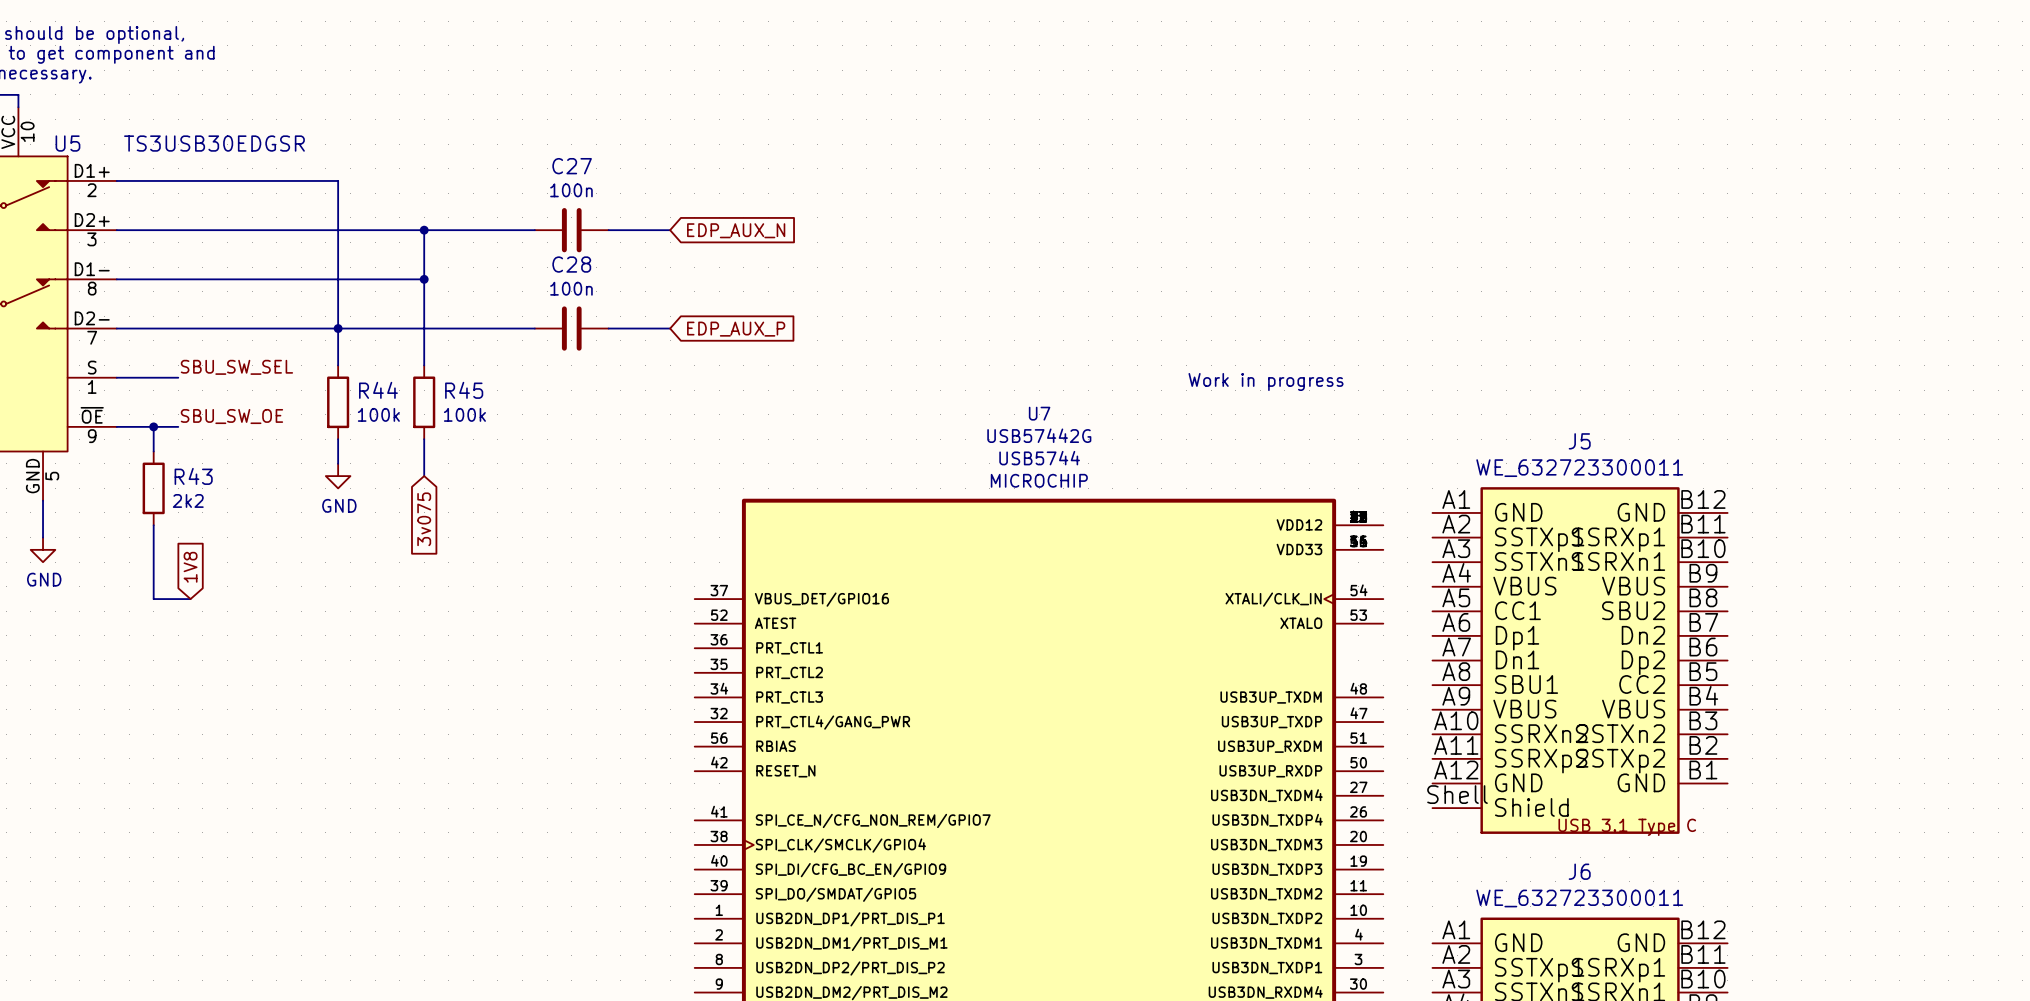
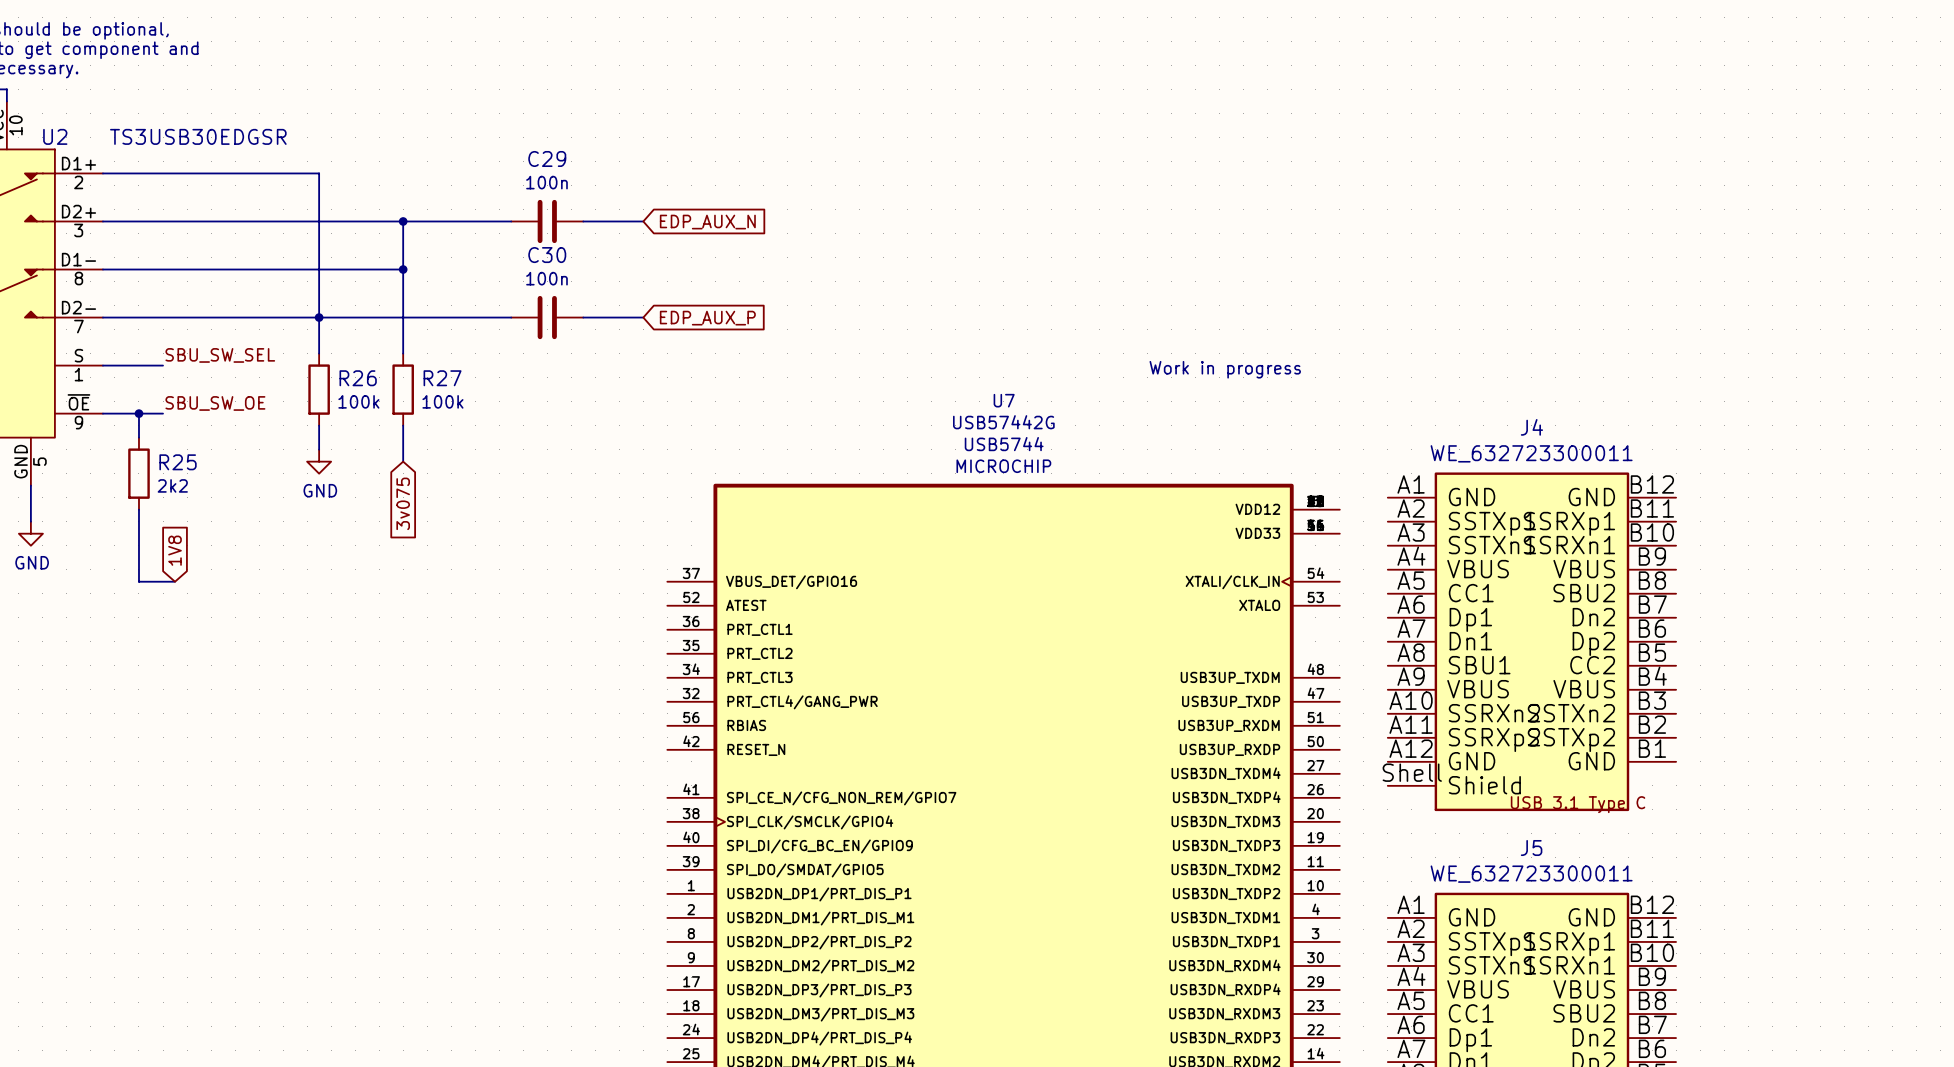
U5 name: U5 (67, 143) -> U2 (55, 136)
C27 name: C27 (572, 166) -> C29 (547, 158)
C28 name: C28 (571, 264) -> C30 (547, 255)
R44 name: R44 (378, 390) -> R26 (358, 378)
R45 name: R45 (464, 390) -> R27 (442, 378)
J5 name: J5 (1579, 441) -> J4 (1531, 427)
R43 name: R43 (193, 476) -> R25 (178, 462)
J6 name: J6 (1579, 871) -> J5 (1531, 848)

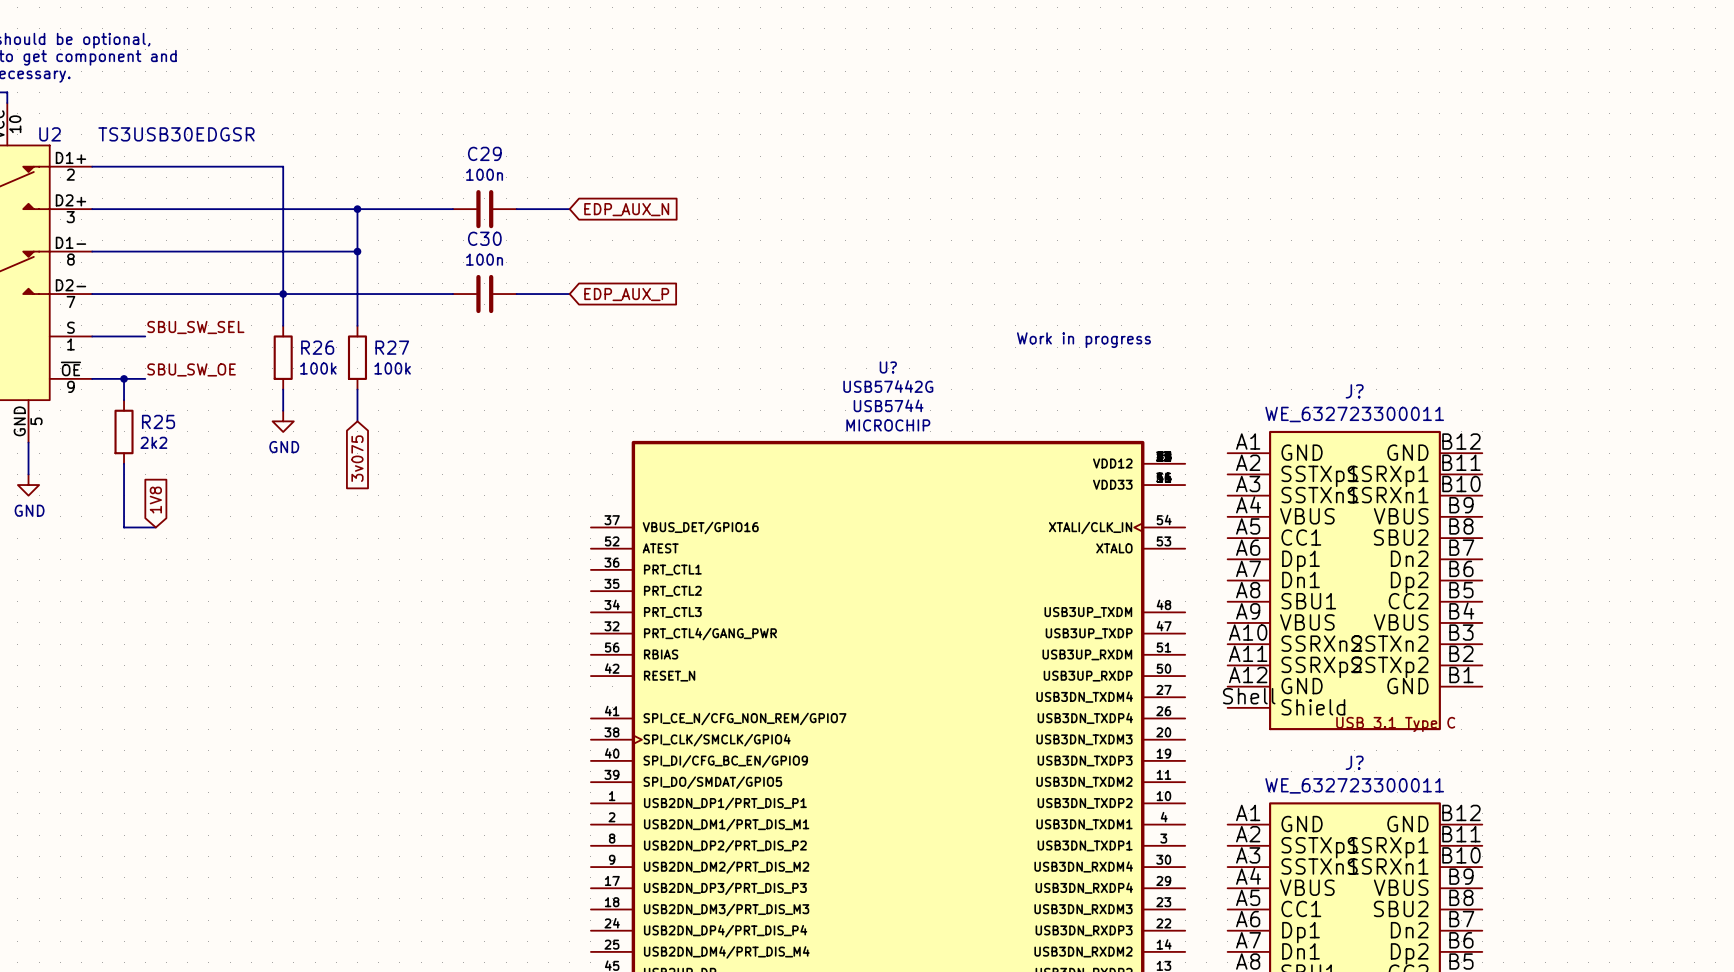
U7 name: U7 (1004, 400) -> U? (888, 367)
J4 name: J4 (1531, 427) -> J? (1354, 391)
J5 name: J5 (1531, 848) -> J? (1354, 762)

